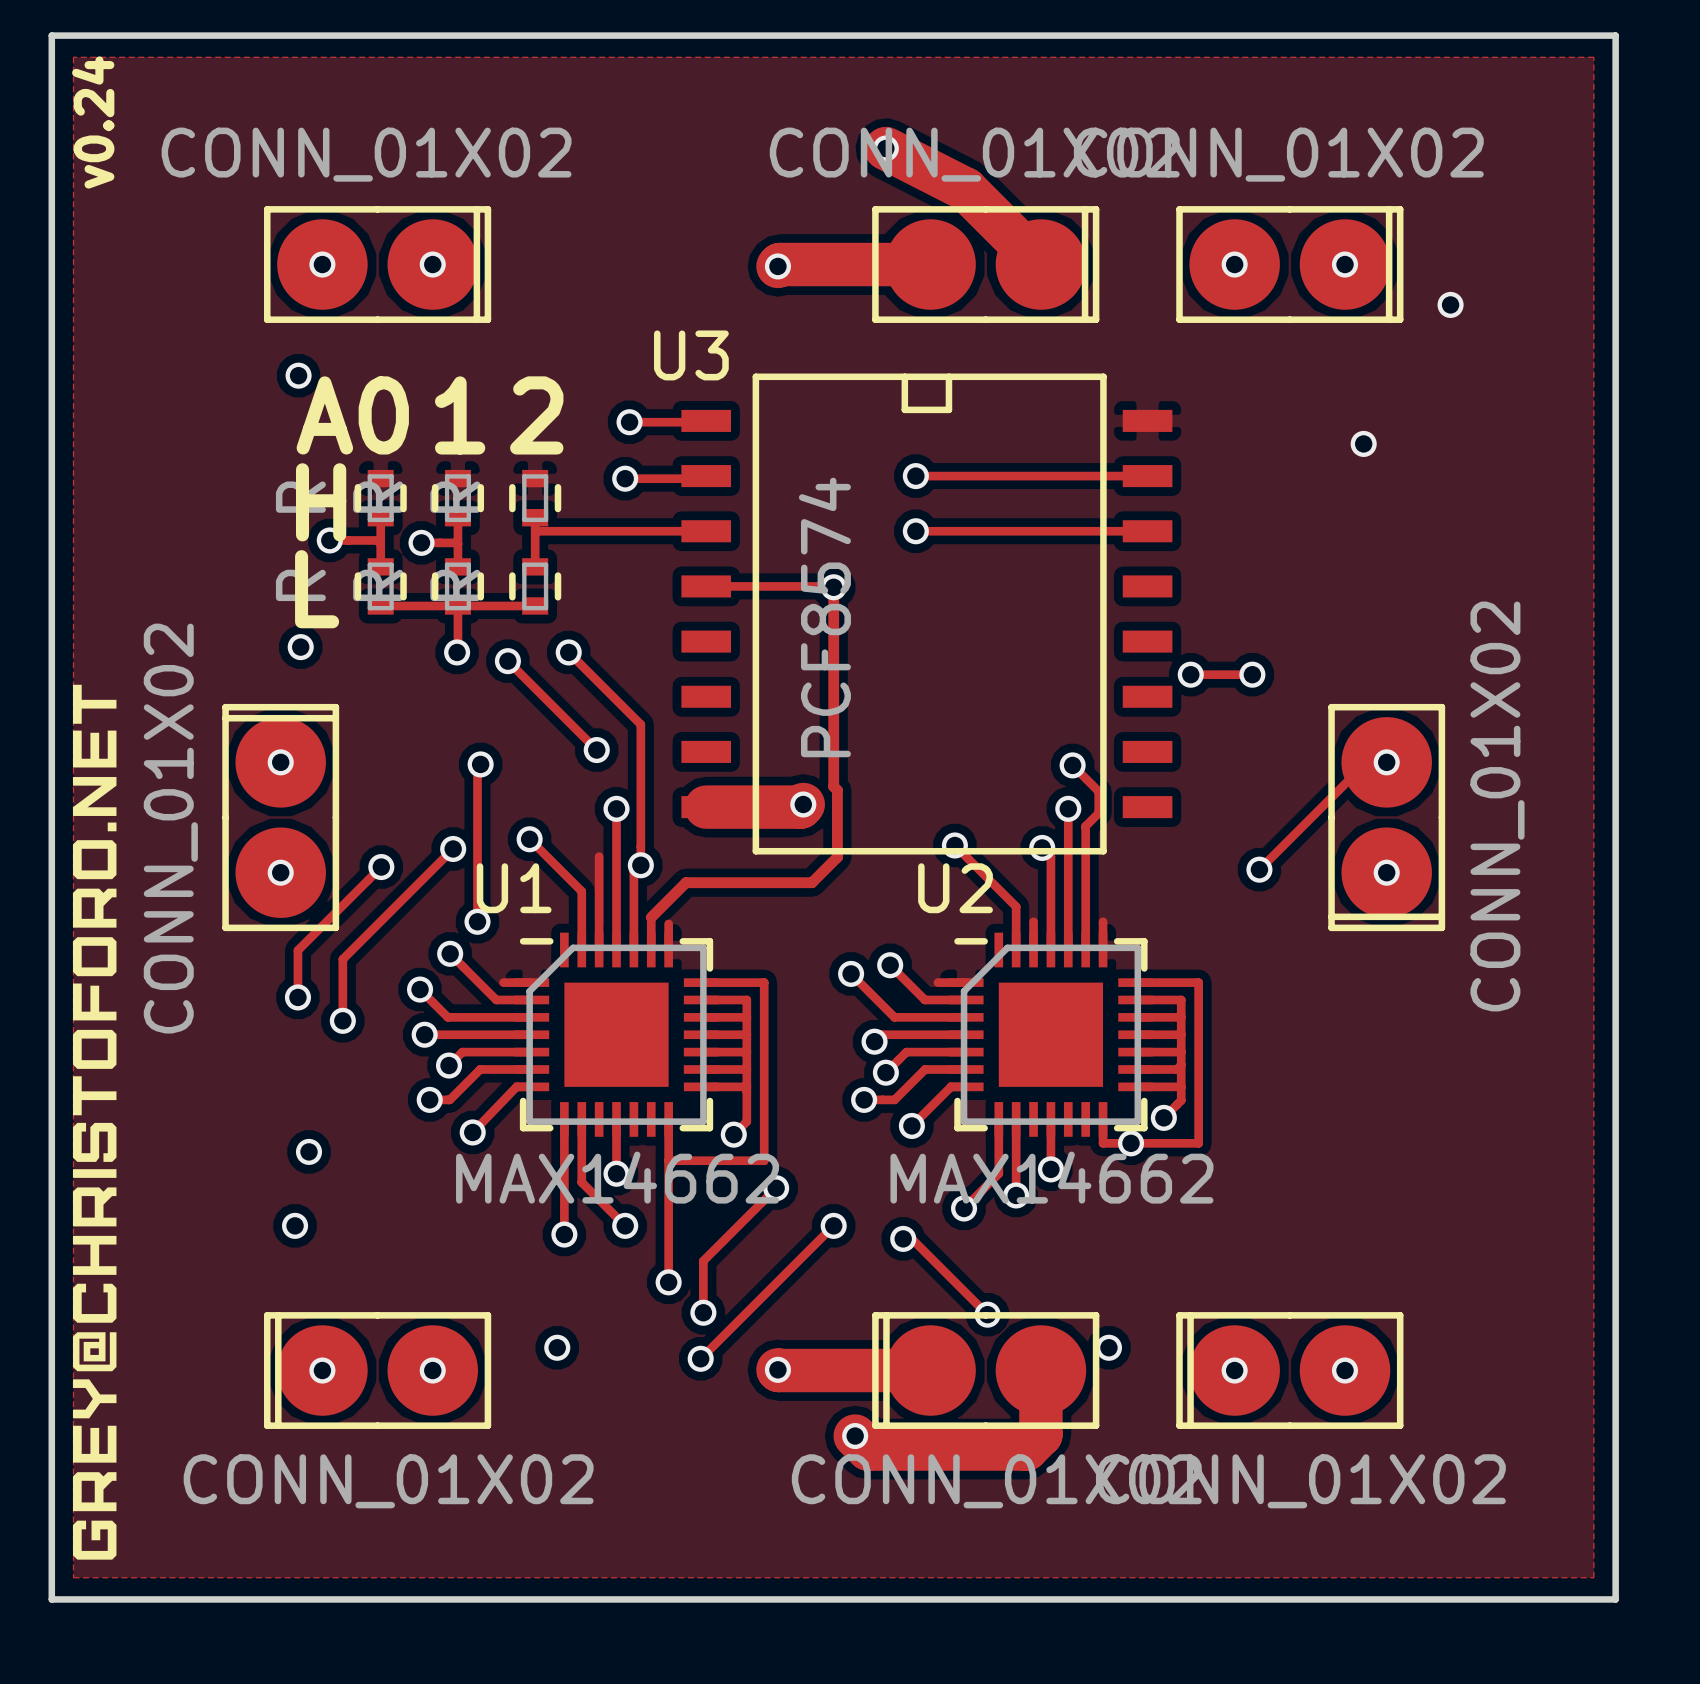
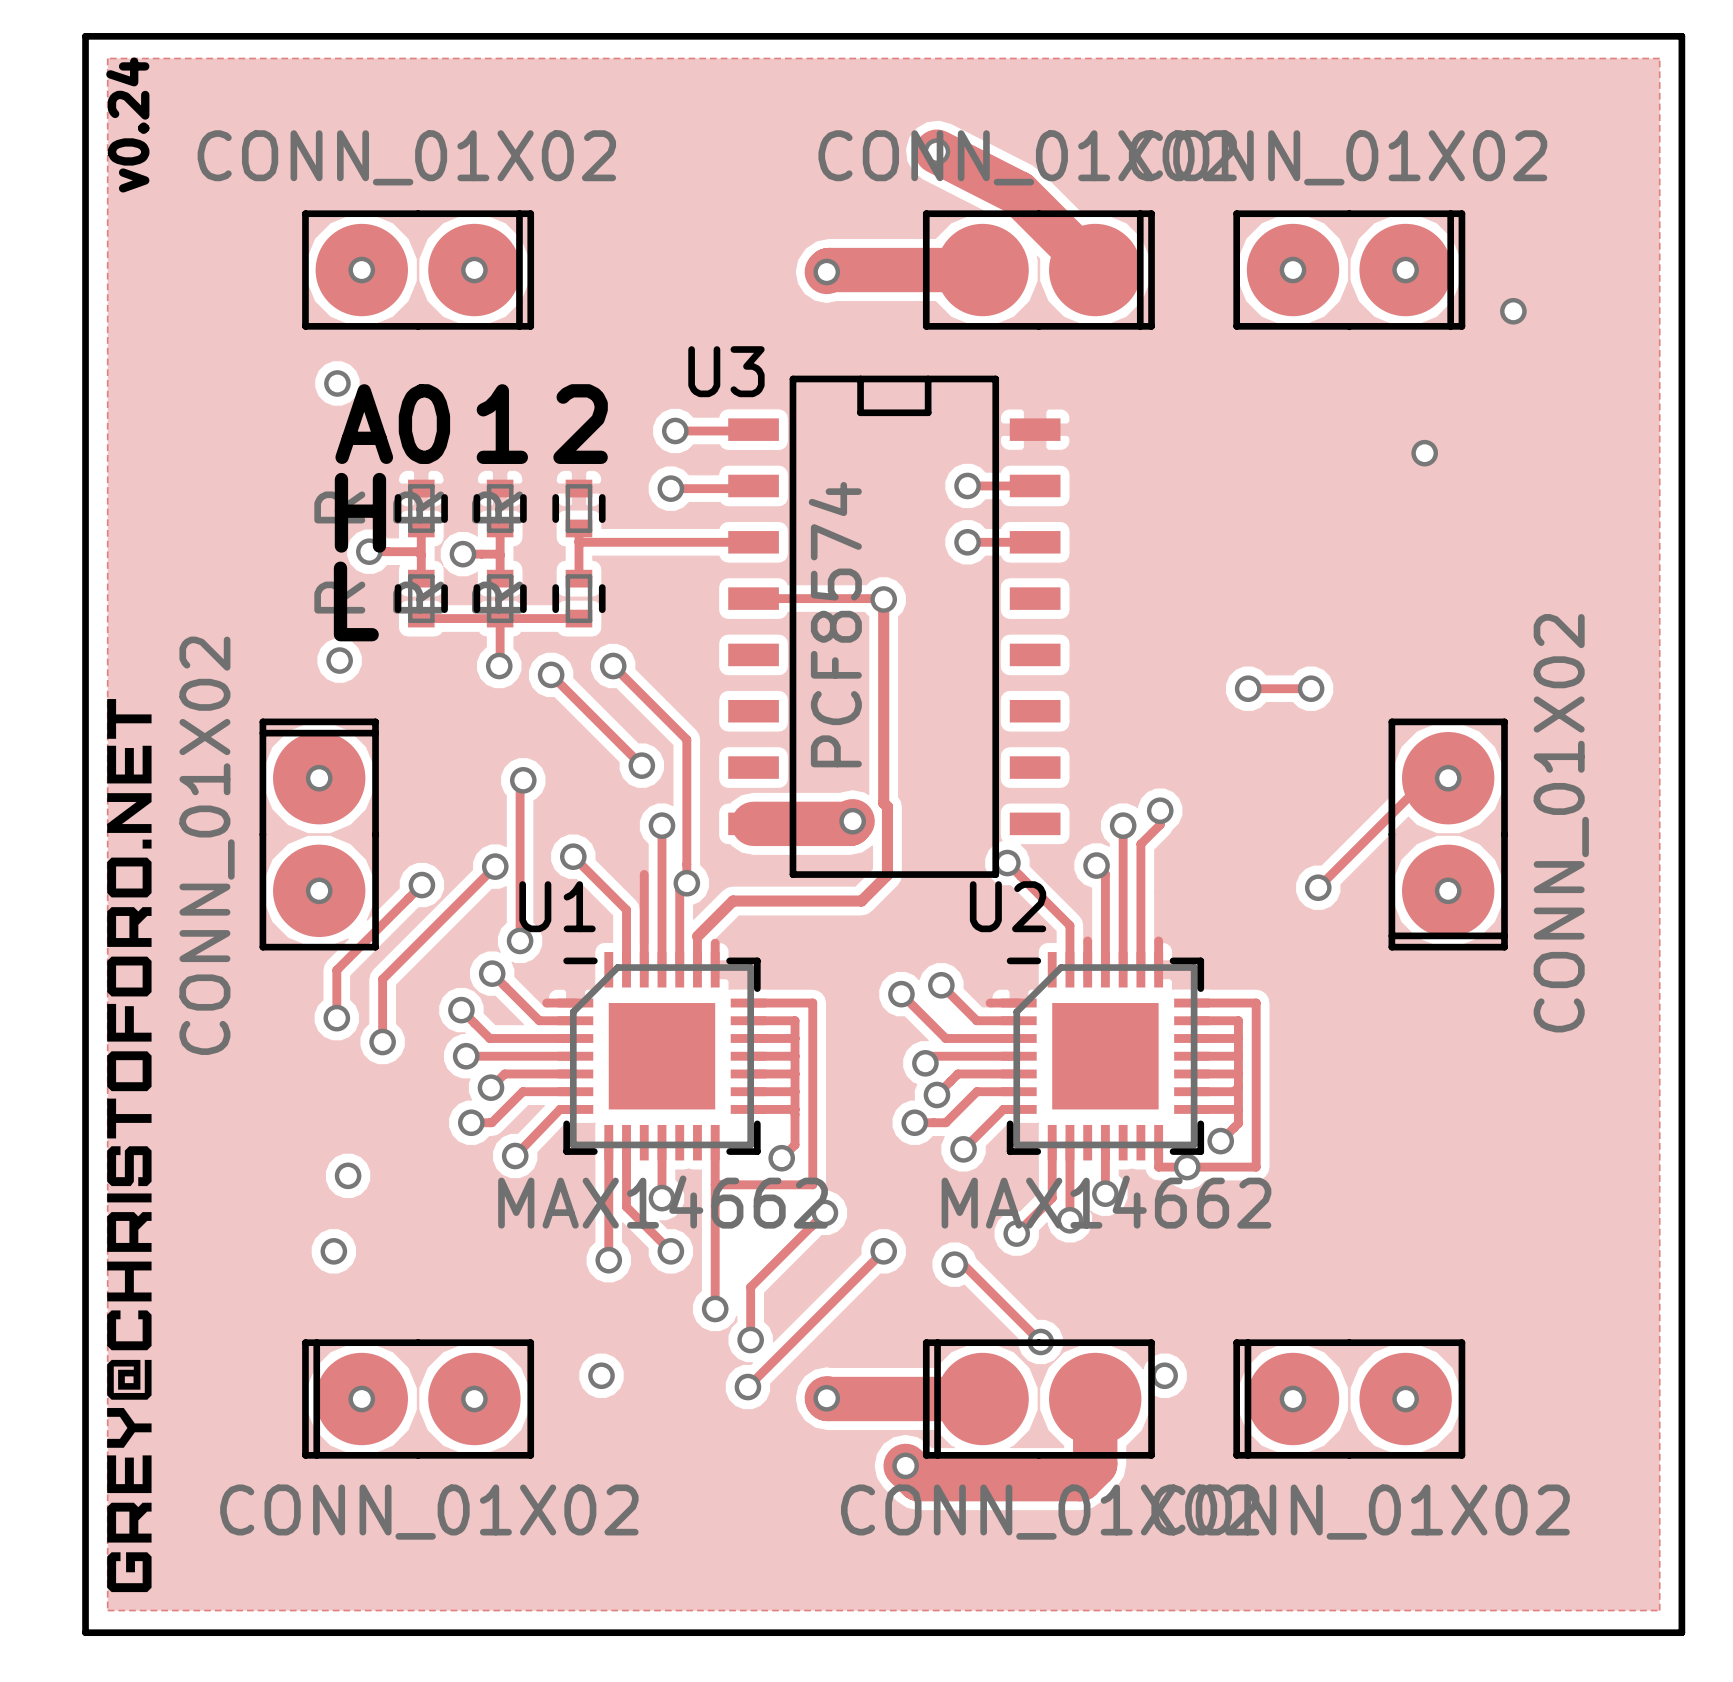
U3 footprint: [681, 373, 1173, 855] -> [728, 375, 1061, 878]
track: (982, 476) (1147, 476) -> none
track: (982, 531) (1147, 531) -> none
track: (1072, 765) (1098, 791) (1098, 813) (1085, 826) -> (1160, 810) (1160, 824) (1140, 844)
via position: (1072, 765) -> (1160, 810)

